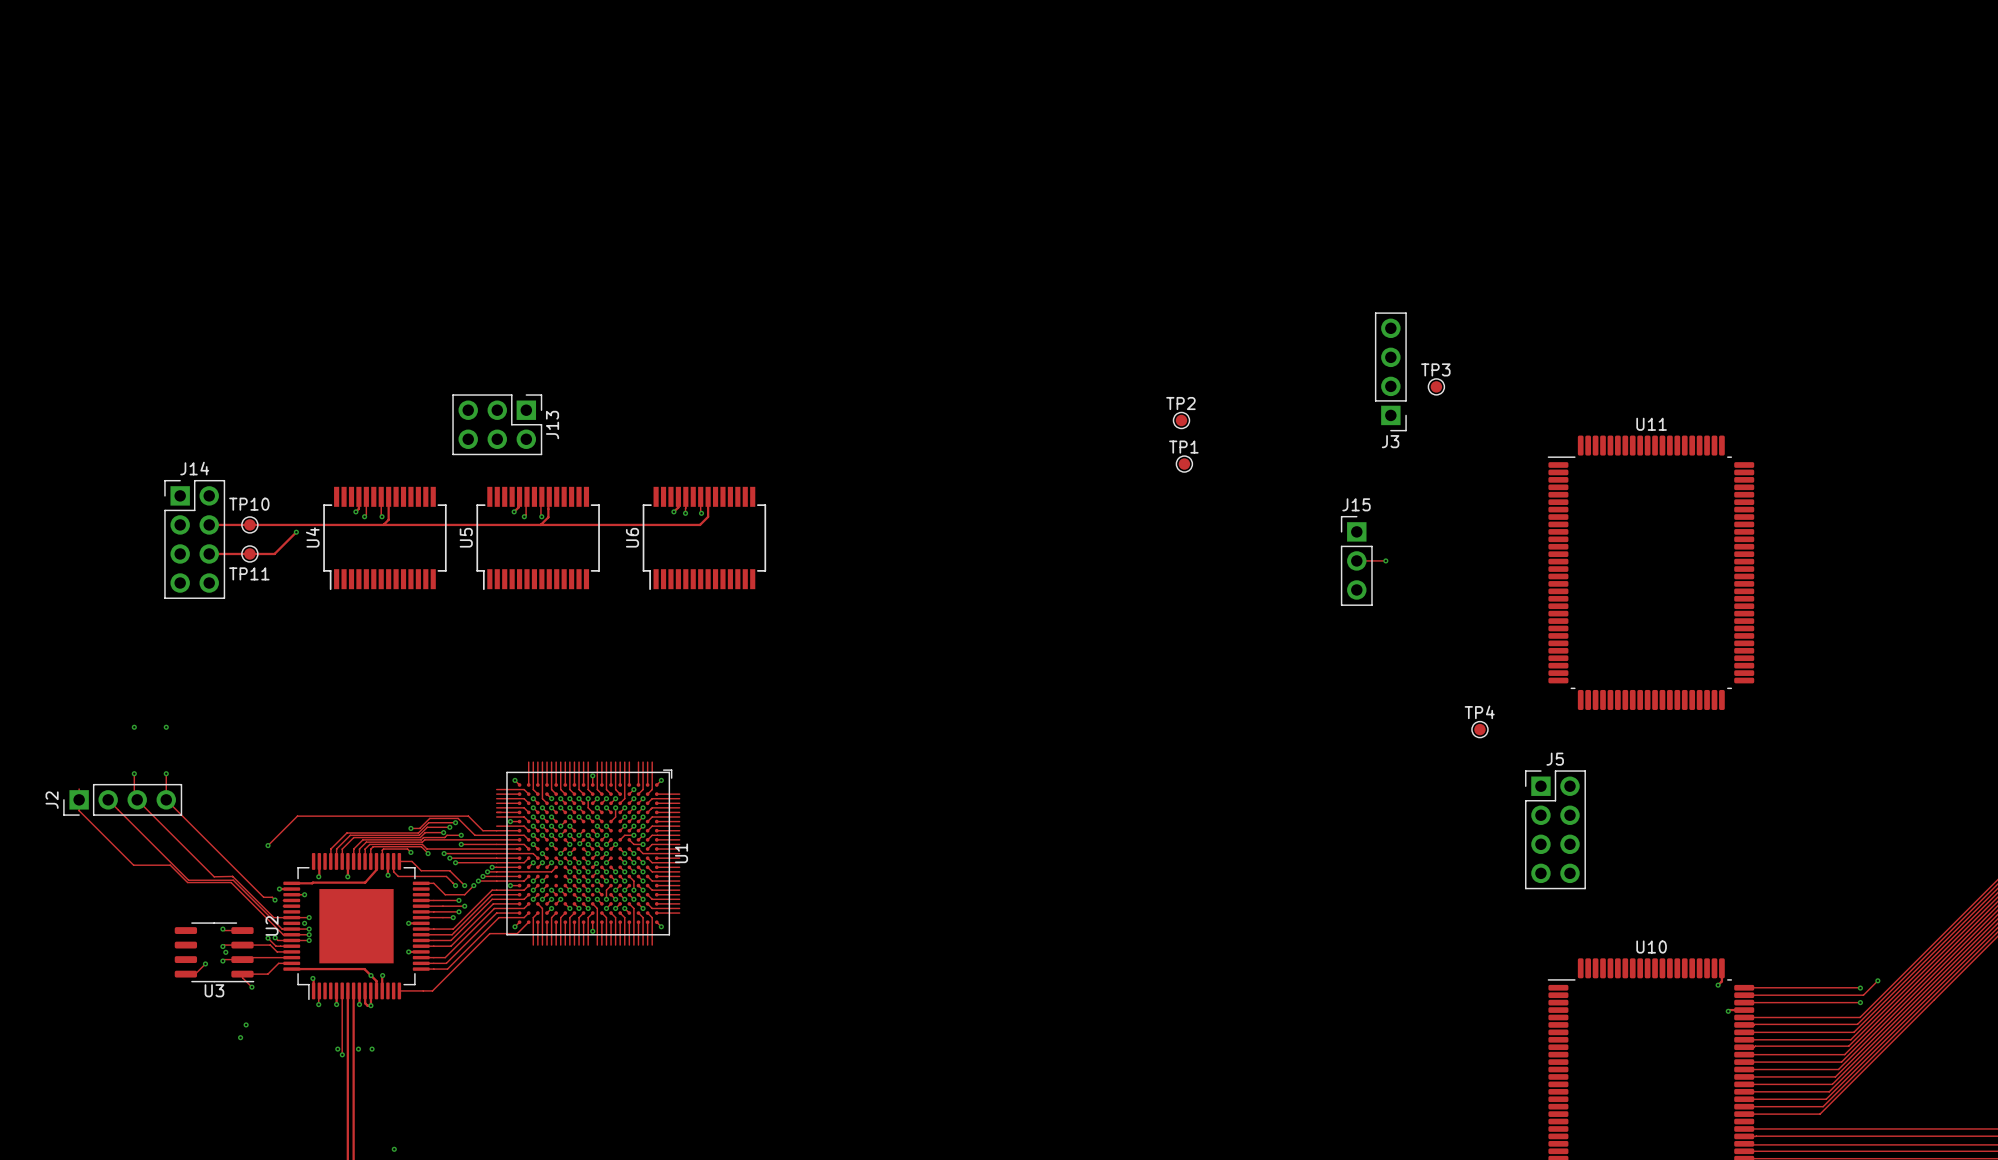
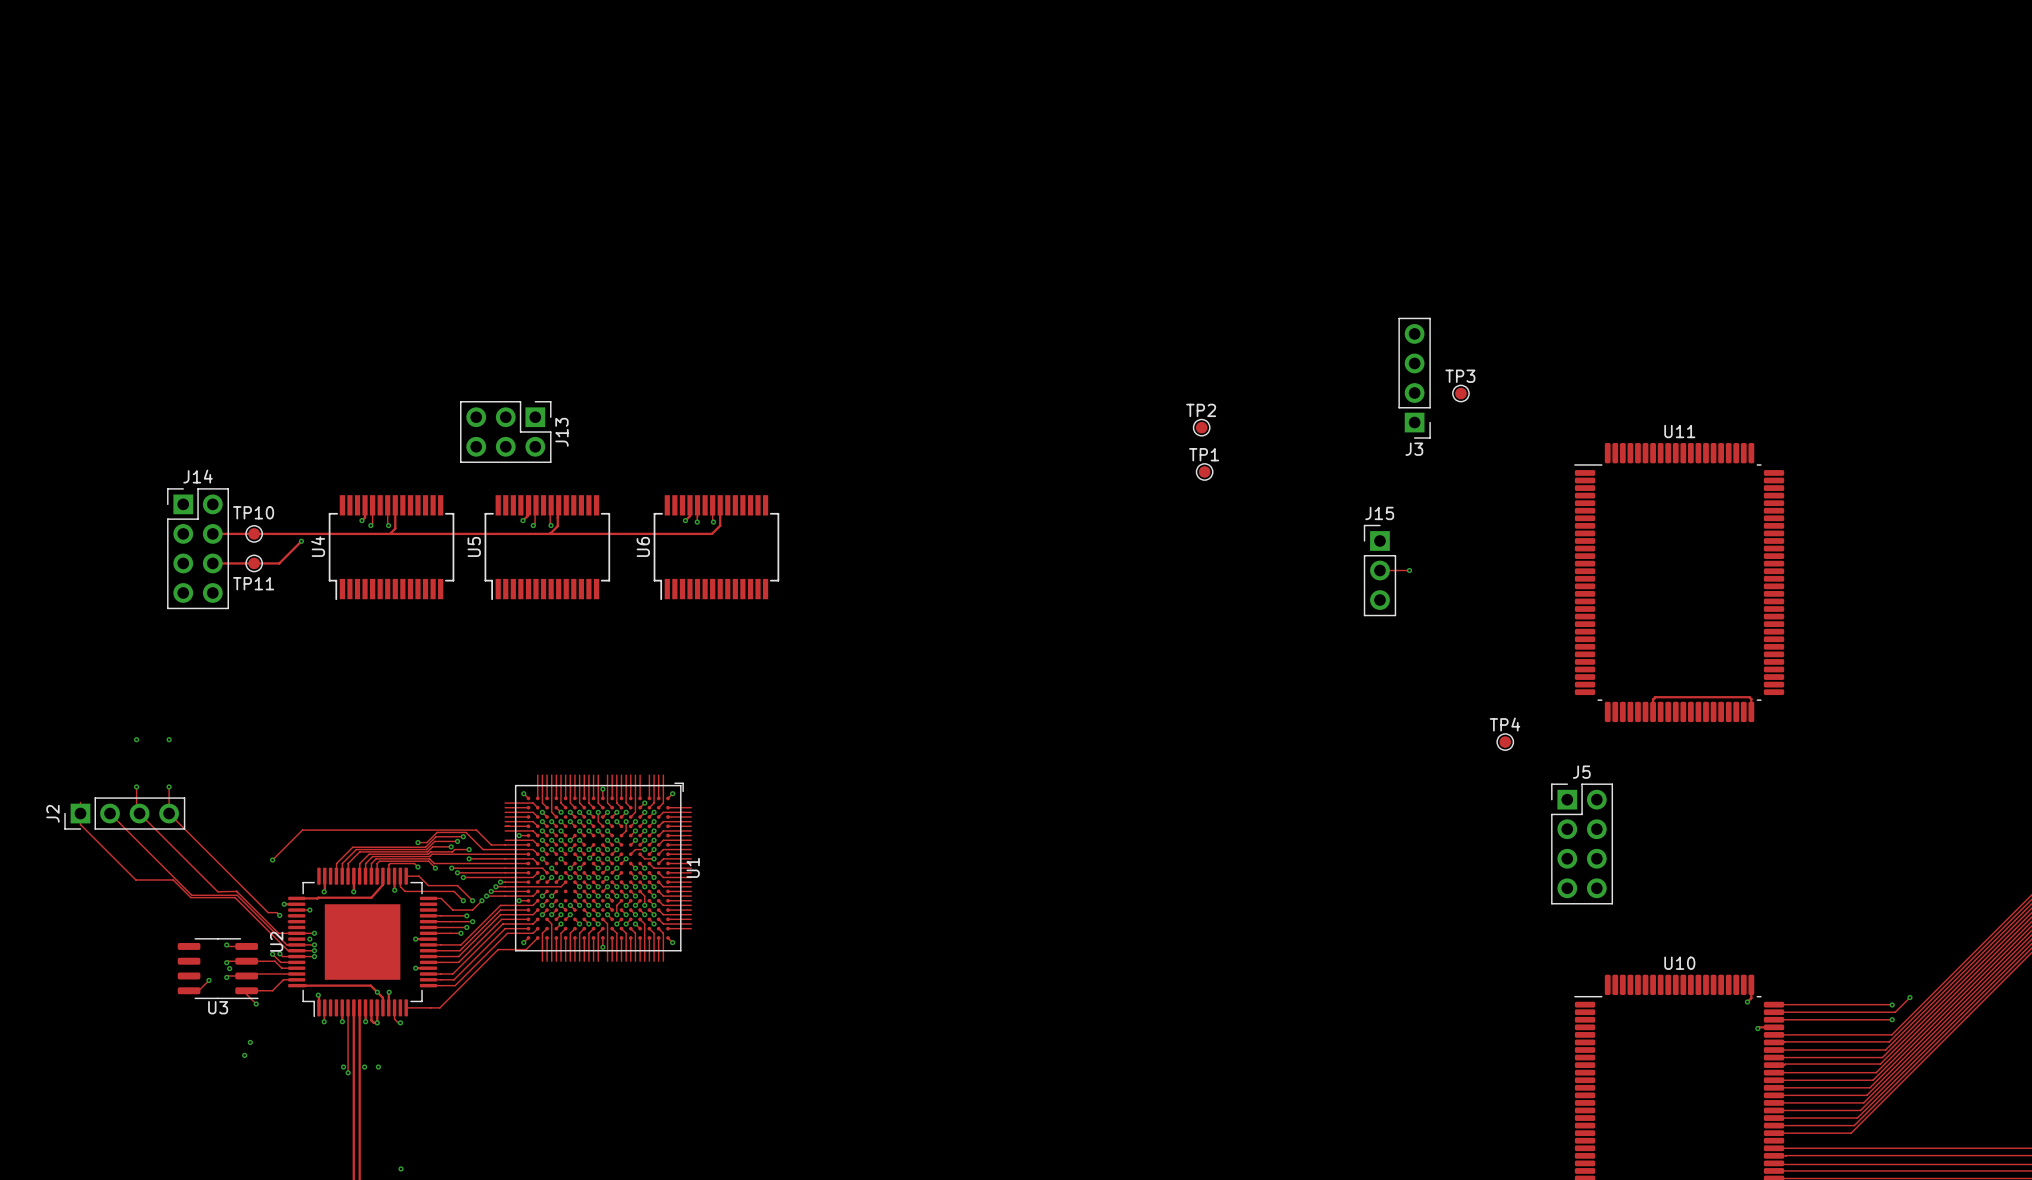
track: none -> (1653, 711) (1653, 699) (1655, 697) (1749, 697) (1751, 699) (1751, 711)
track: none -> (394, 1007) (394, 1019) (400, 1022)
via: none -> (400, 1022)

